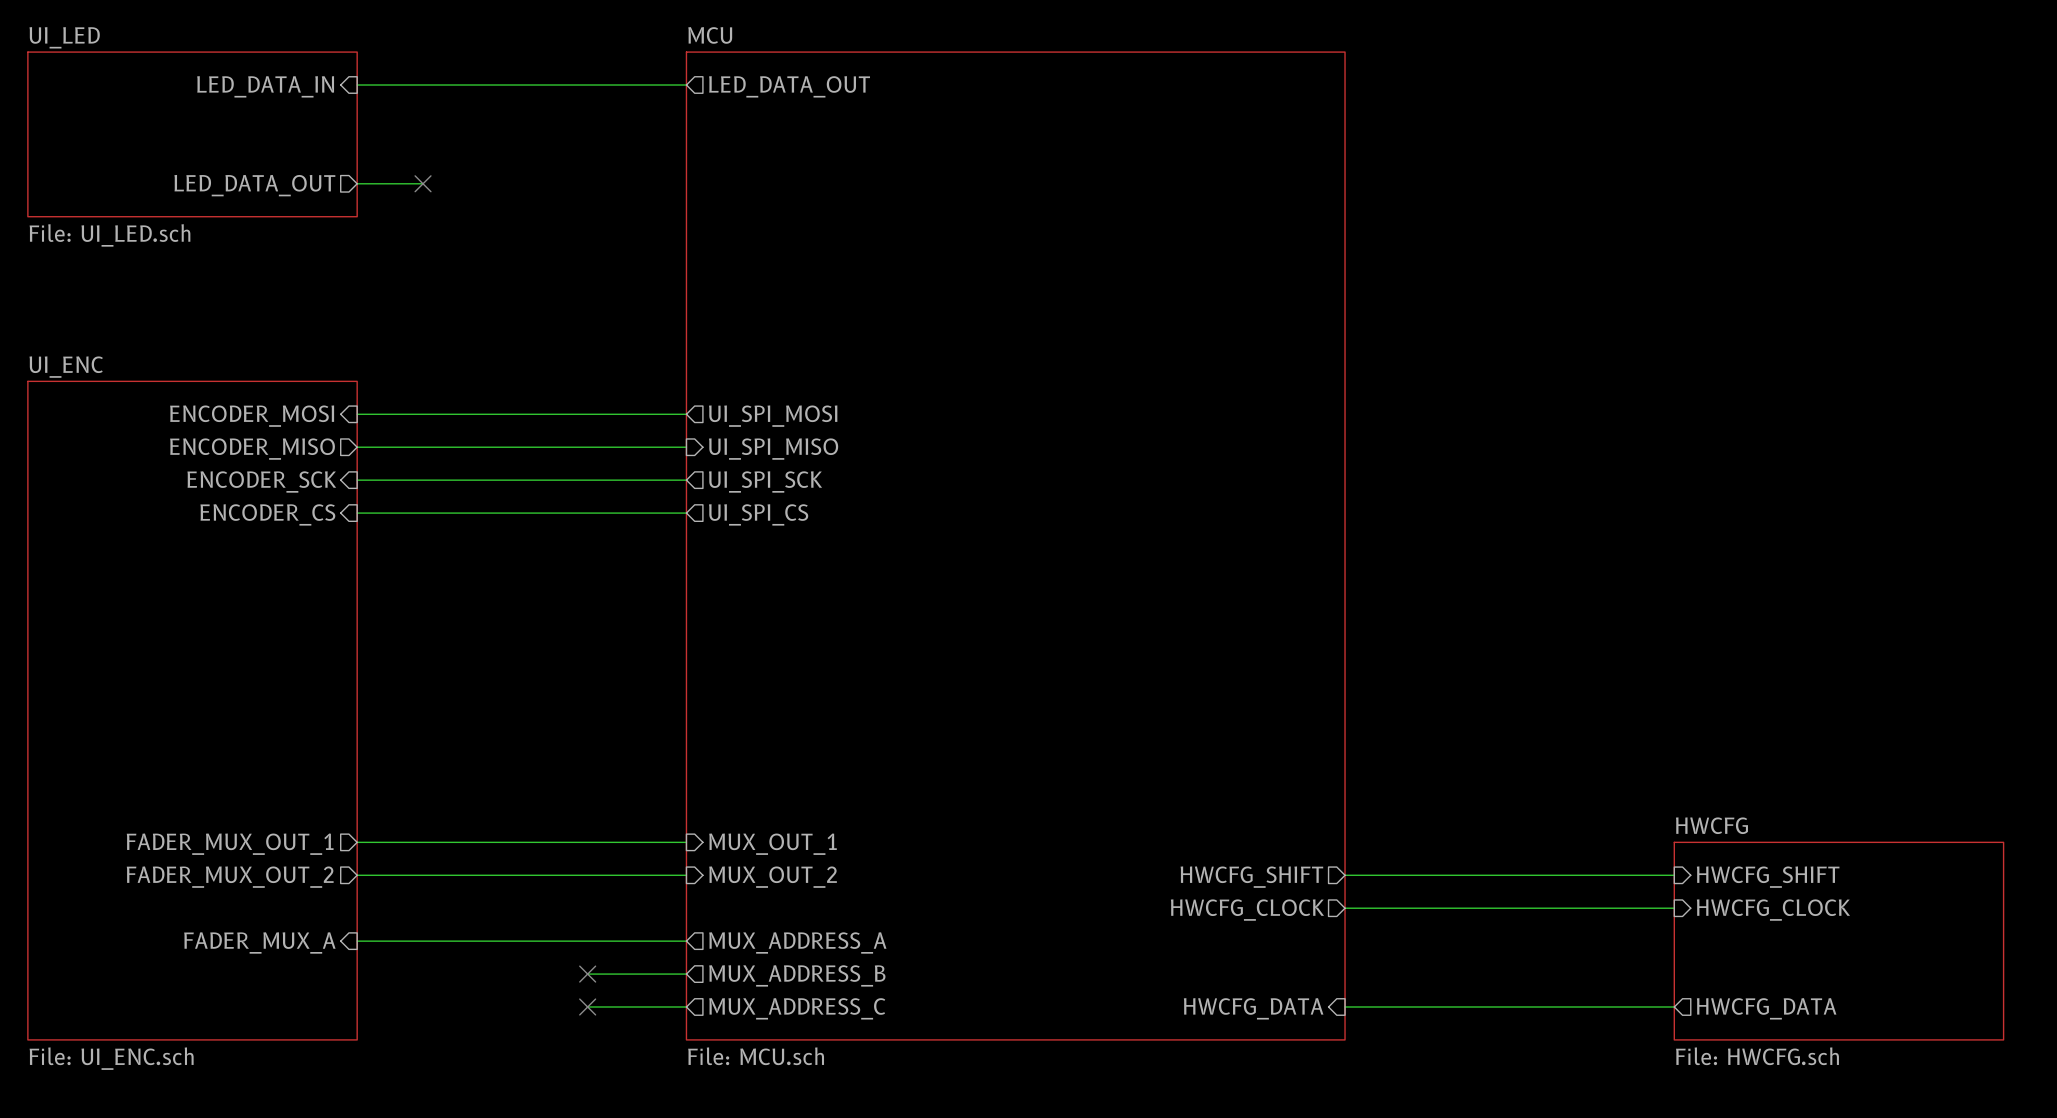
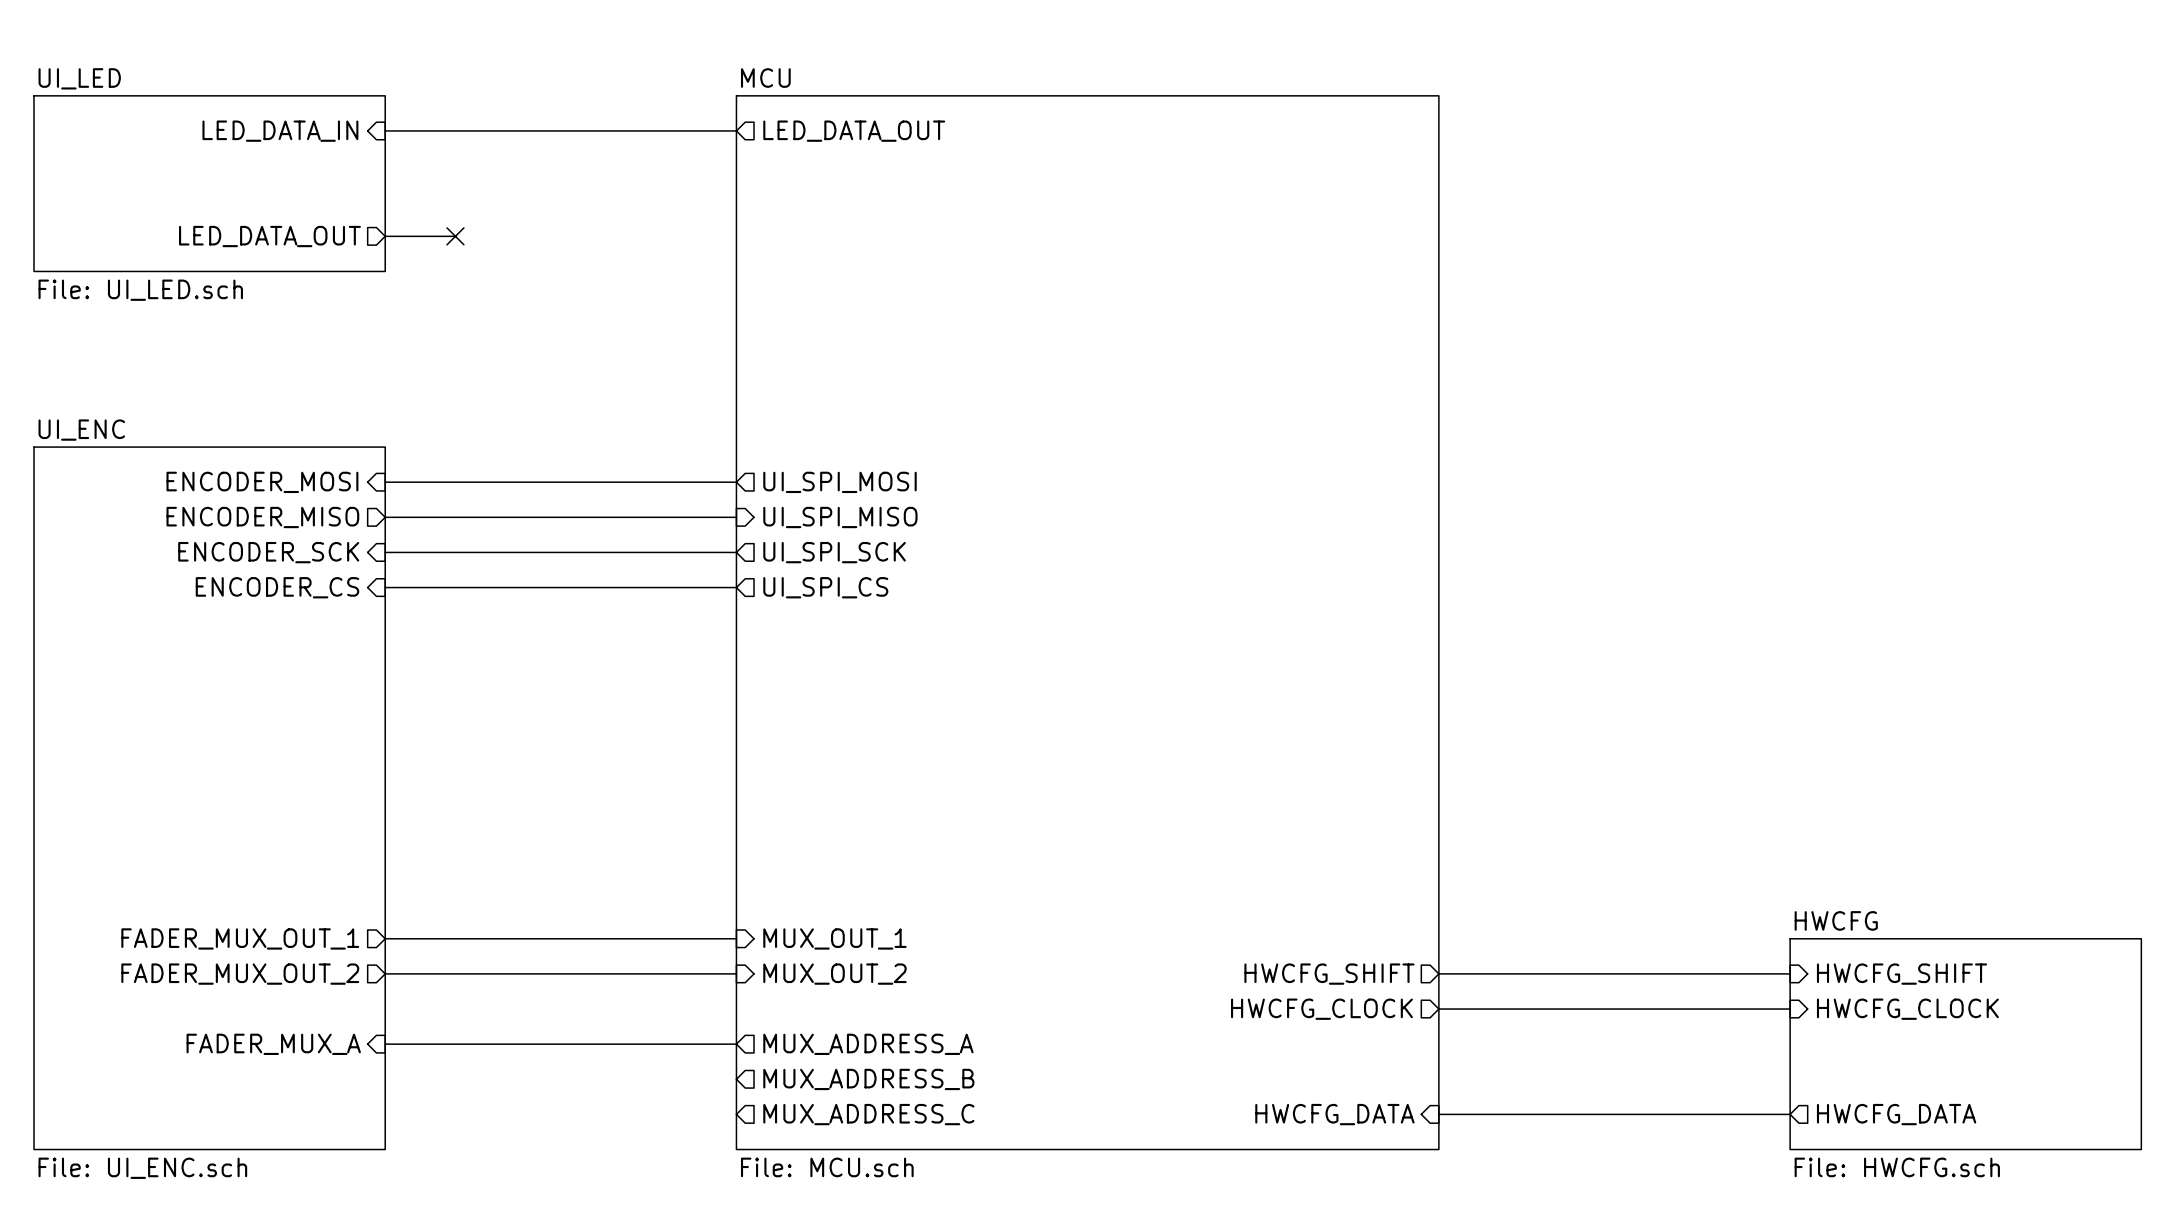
wire: (587, 974) (686, 974) -> none
no-connect mark: (587, 974) -> none
wire: (587, 1007) (686, 1007) -> none
no-connect mark: (587, 1007) -> none

